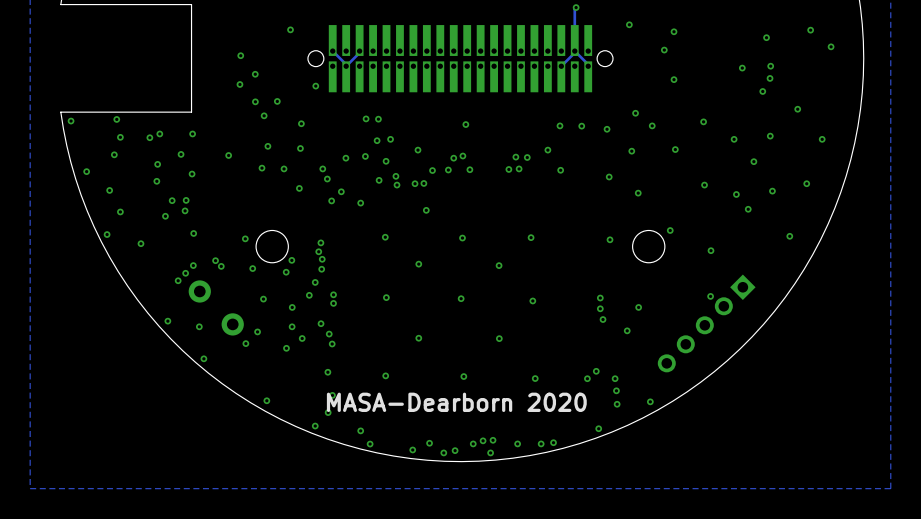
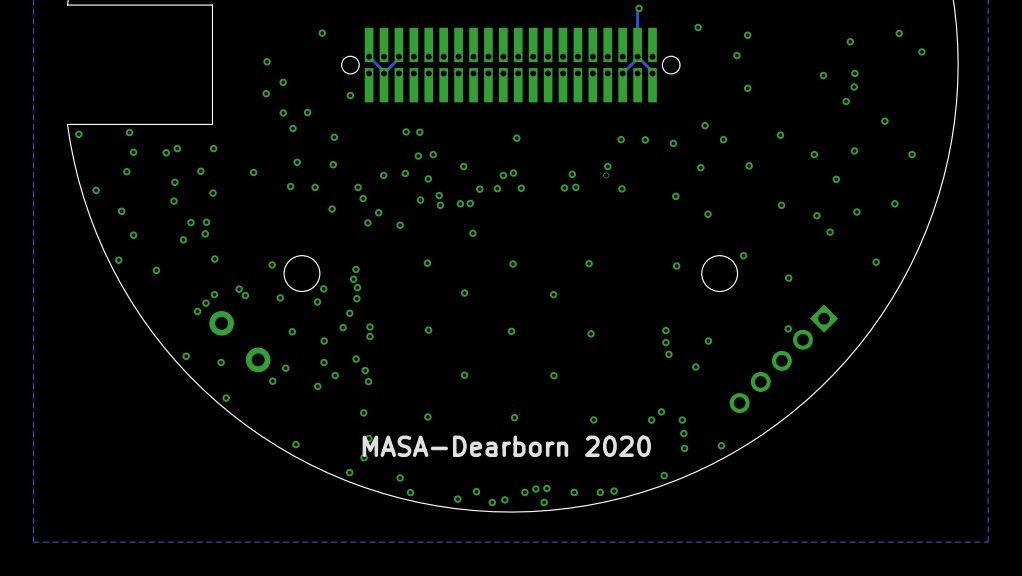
via: (527, 157) -> none
via: none -> (606, 175)

